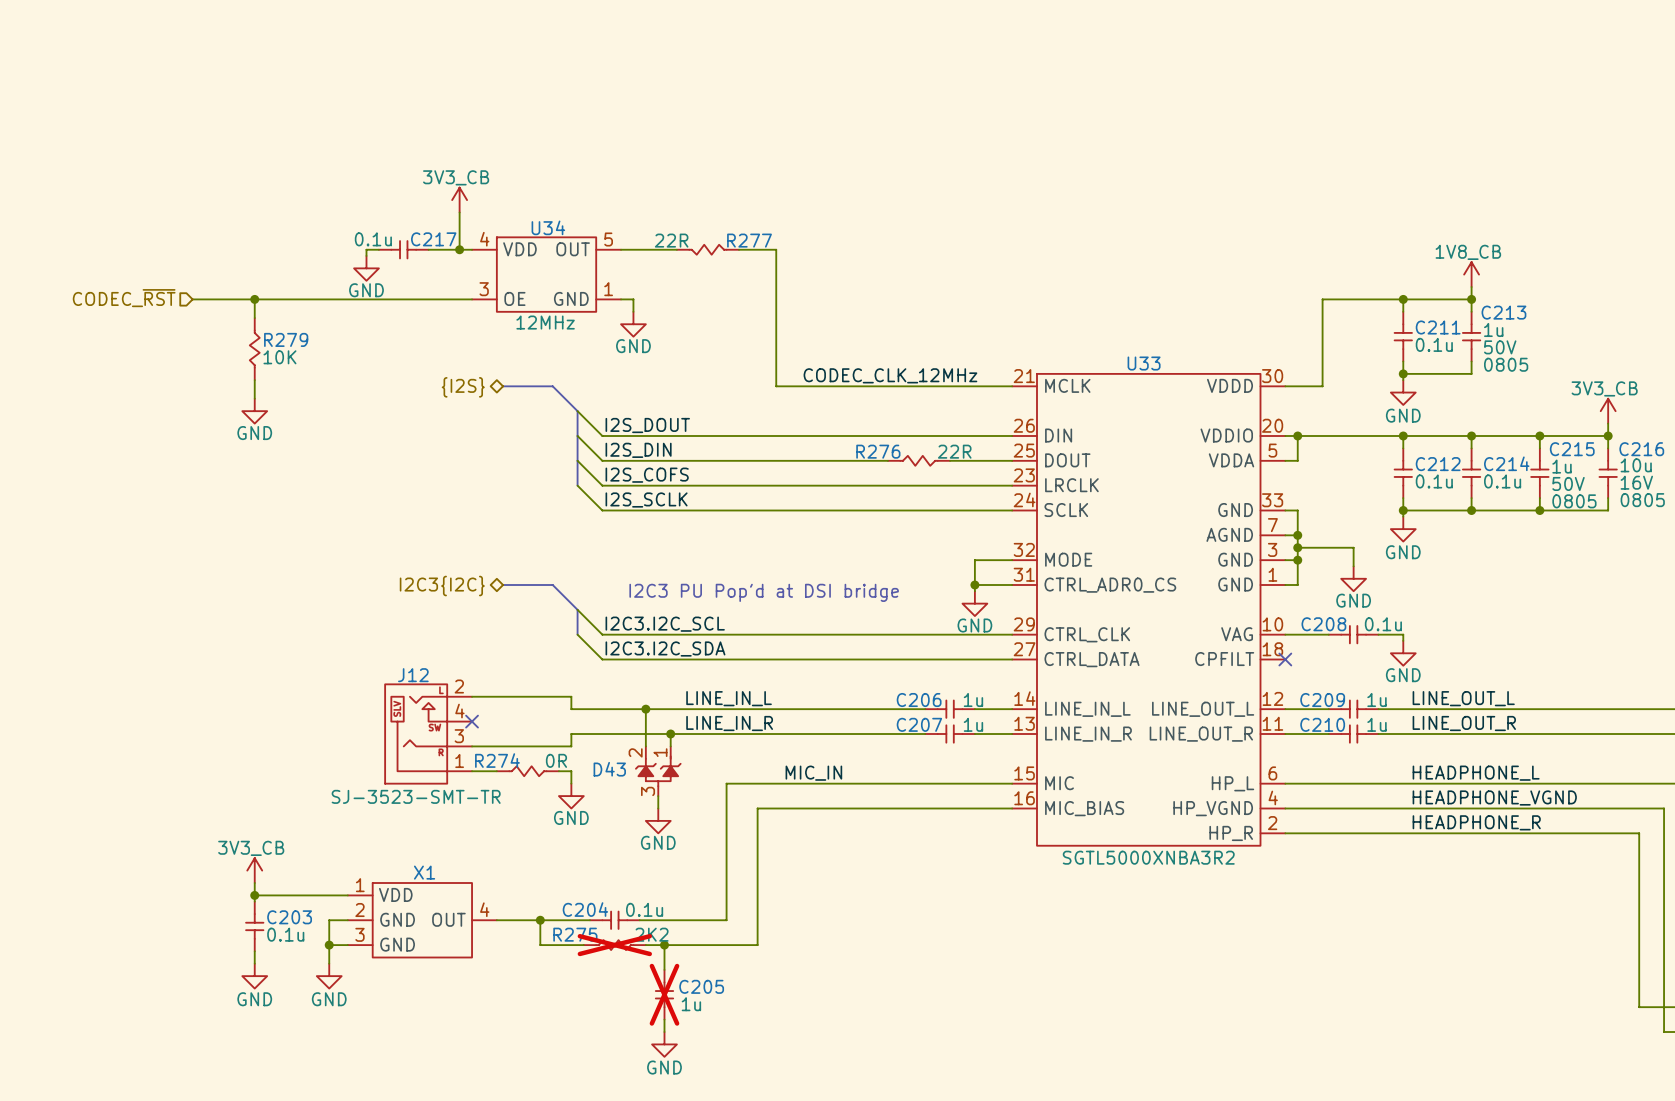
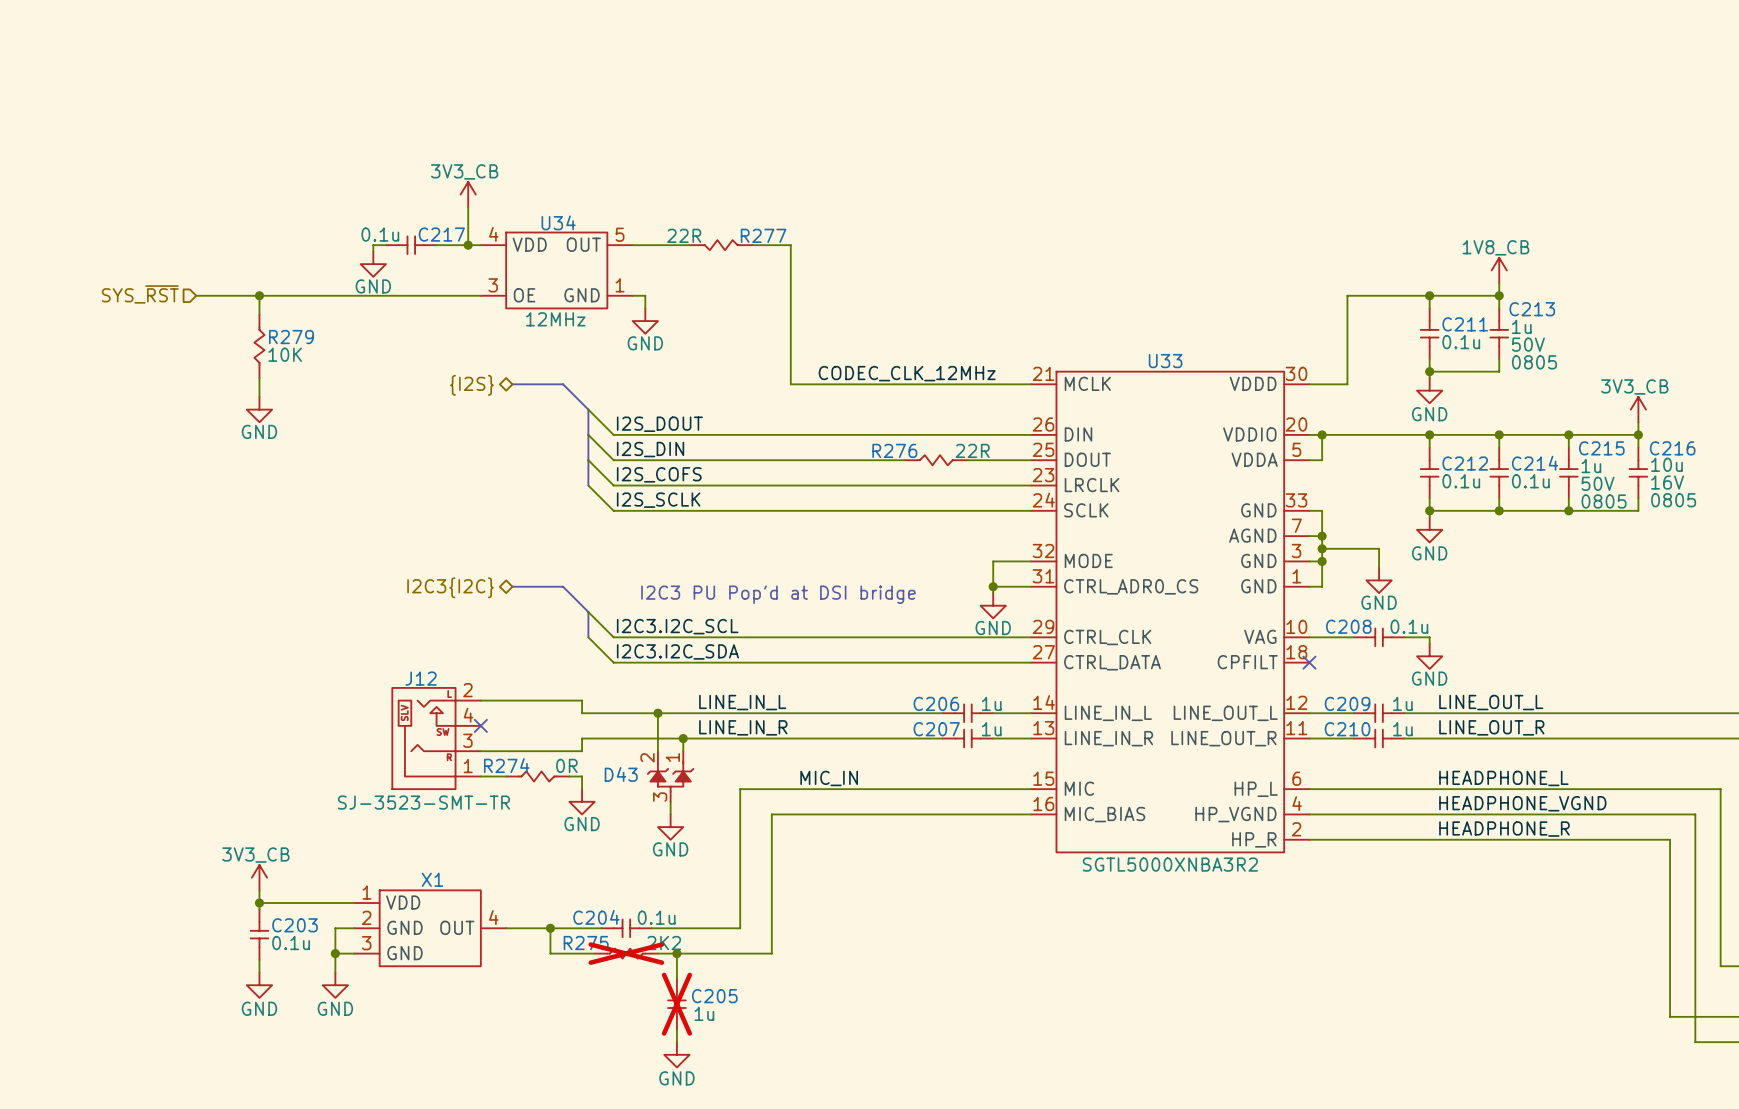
hierarchical label: CODEC_~{RST} (124, 298) -> SYS_~{RST} (140, 294)

